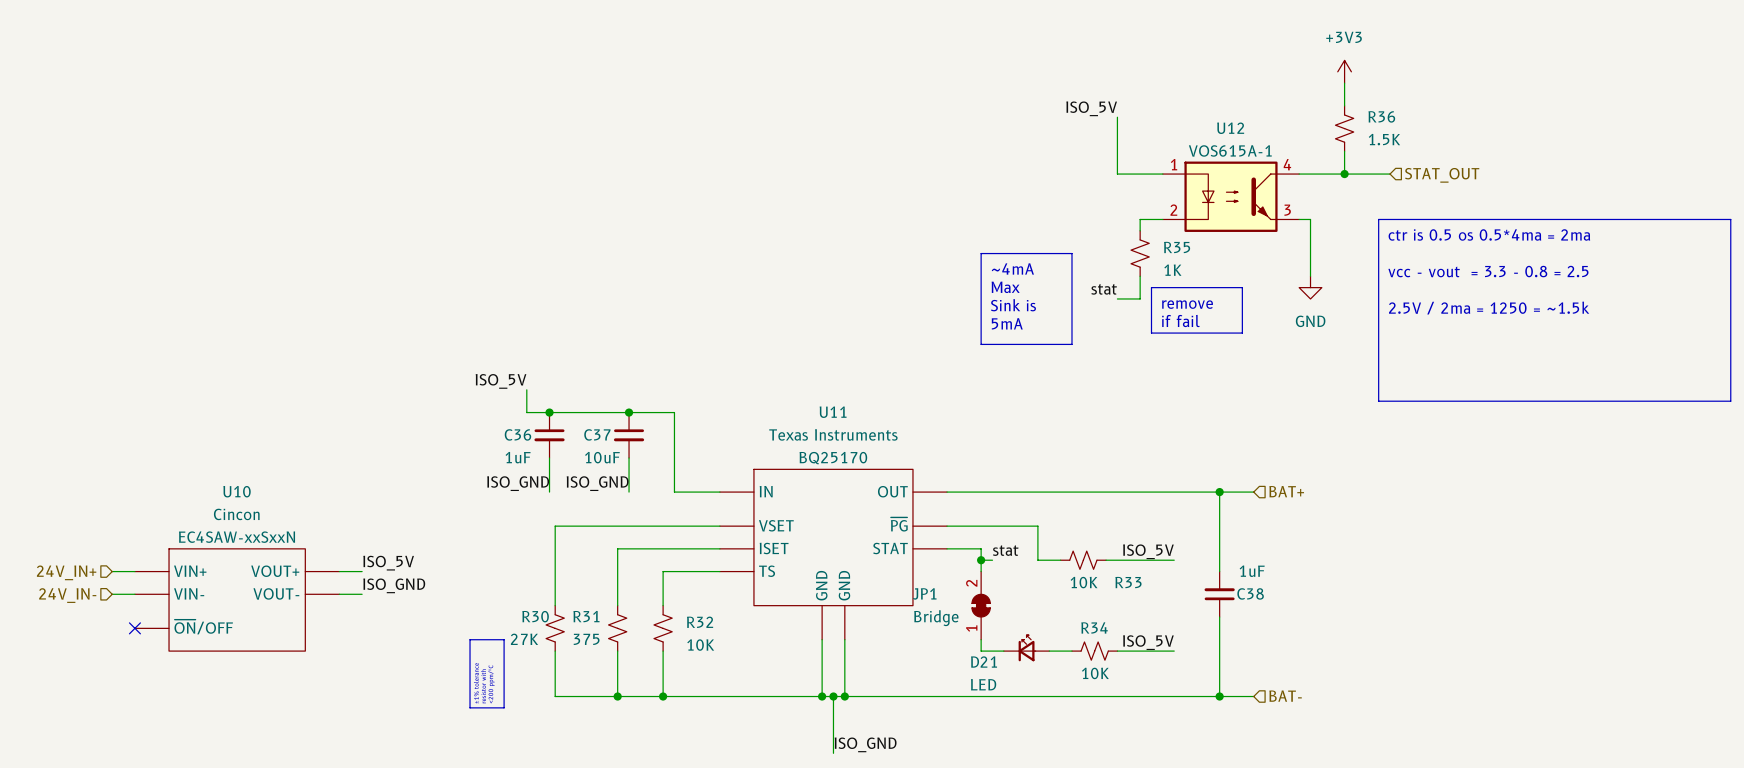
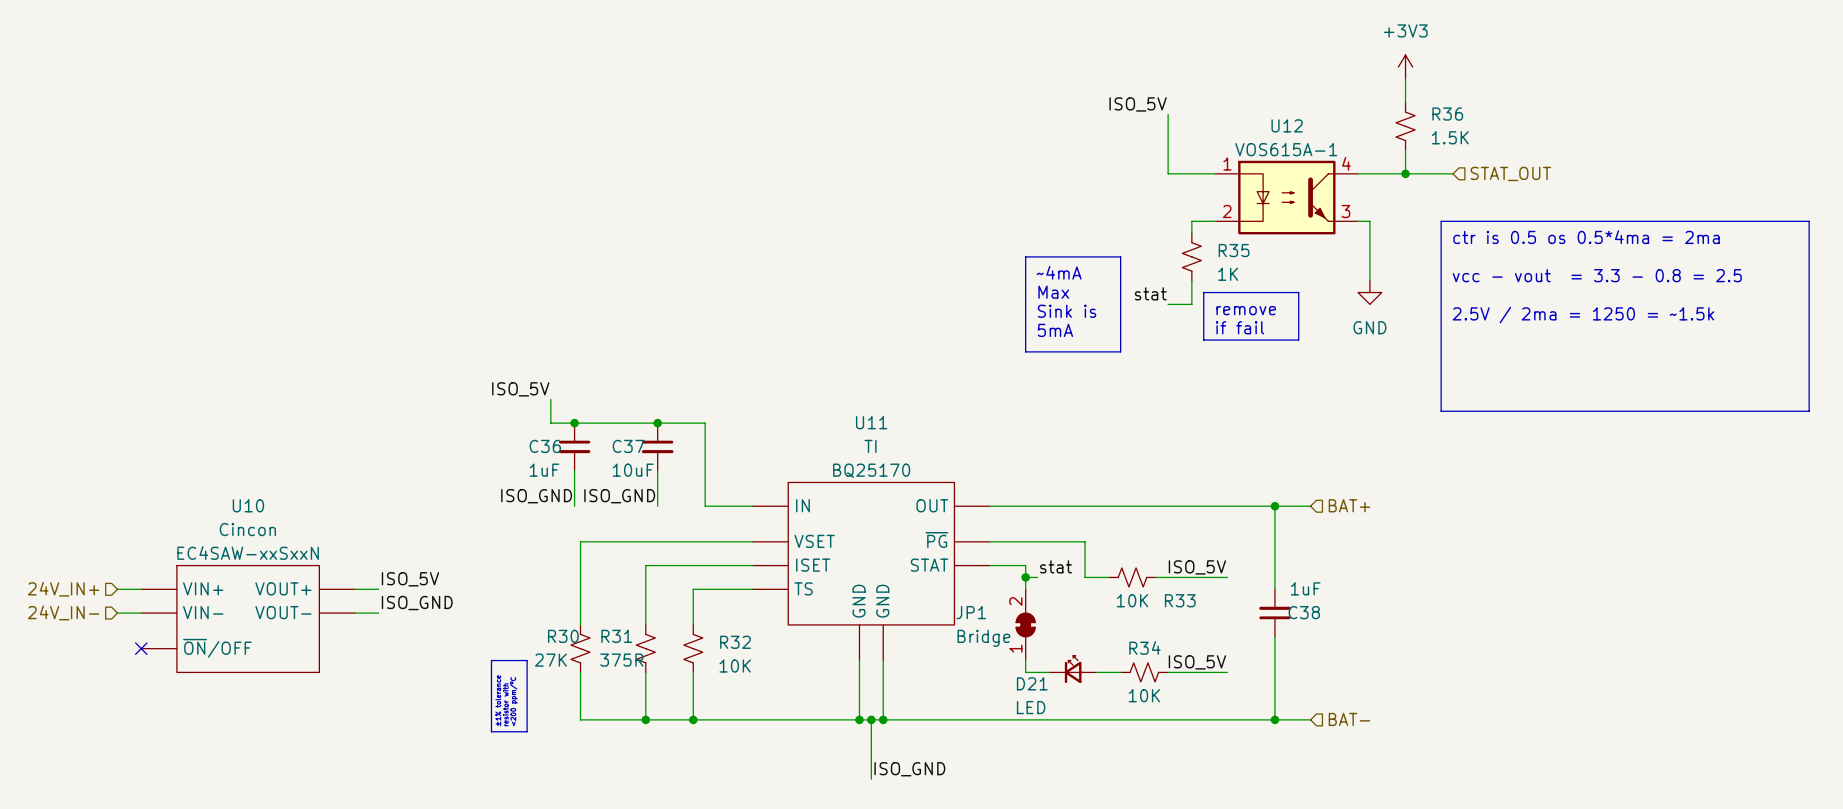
U11 text: Texas Instruments (833, 434) -> TI (870, 446)
R31 value: 375 (586, 639) -> 375R (621, 660)

